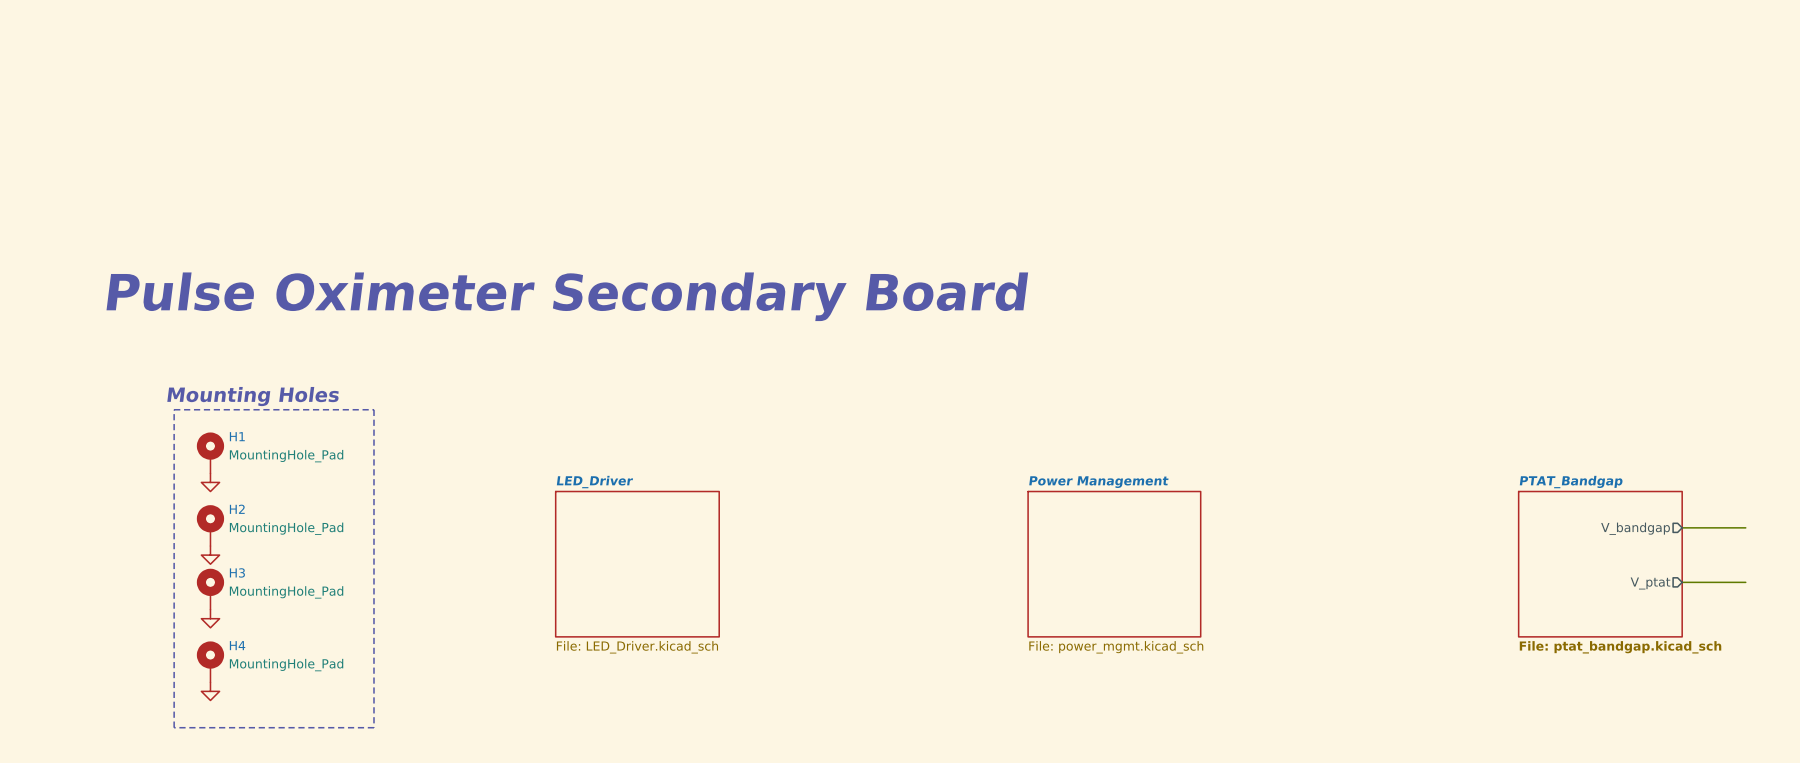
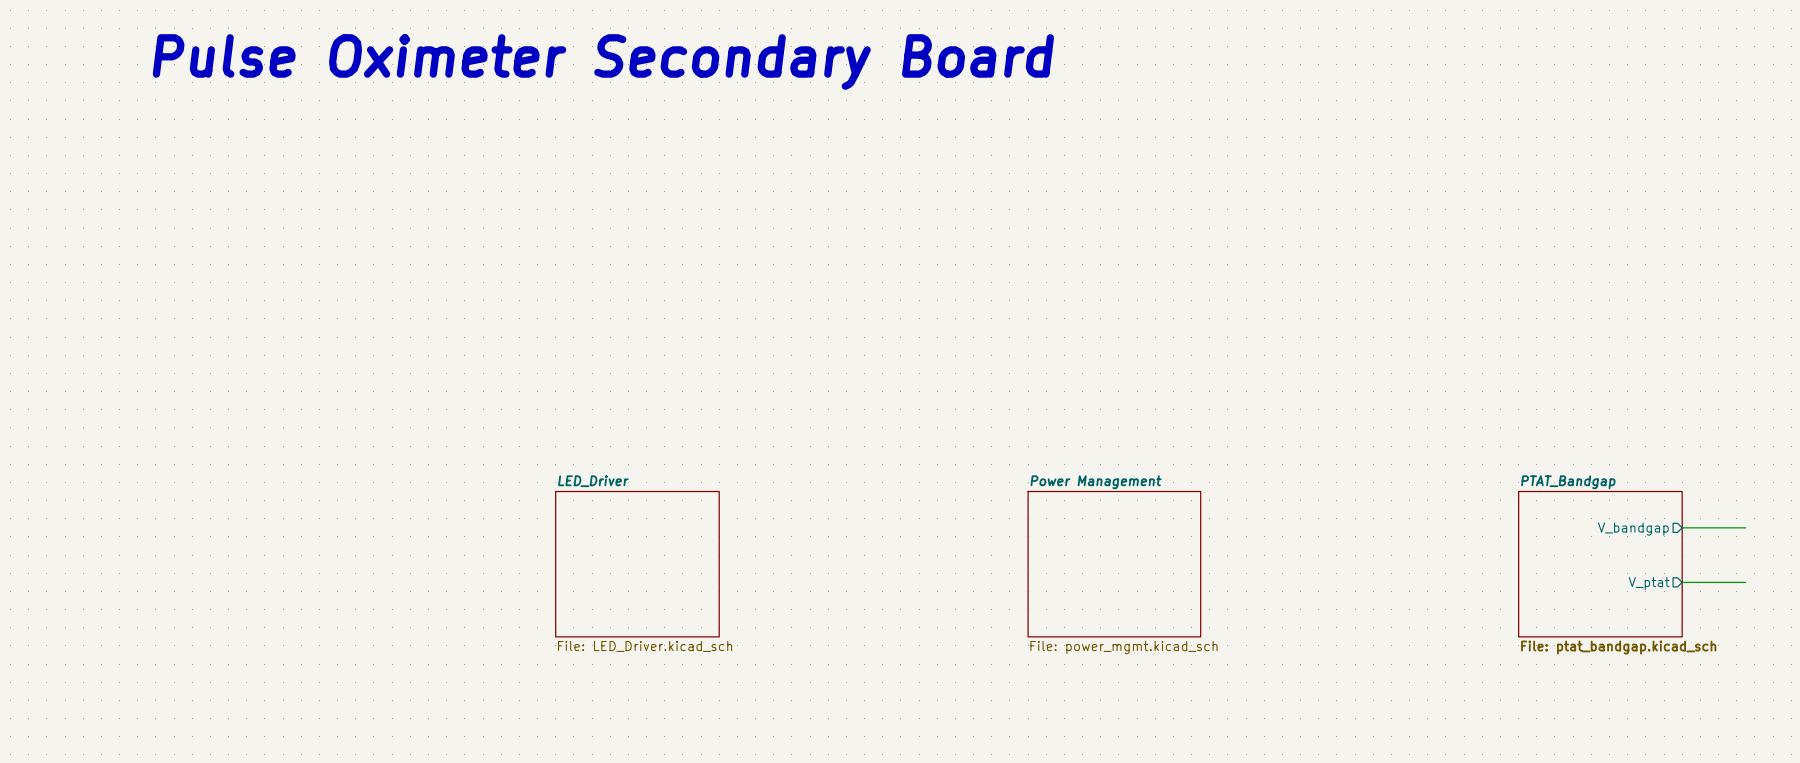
text: none -> Pulse Oximeter Secondary Board (603, 62)
text: Pulse Oximeter Secondary Board (567, 296) -> none
text: Mounting Holes (253, 396) -> none
line: (174, 409) (373, 409) (373, 727) (174, 727) (174, 409) -> none
H1: MountingHole_Pad (210, 452) -> none
power symbol: (210, 482) -> none
H2: MountingHole_Pad (210, 525) -> none
power symbol: (210, 555) -> none
H3: MountingHole_Pad (210, 589) -> none
power symbol: (210, 618) -> none
H4: MountingHole_Pad (210, 661) -> none
power symbol: (210, 691) -> none

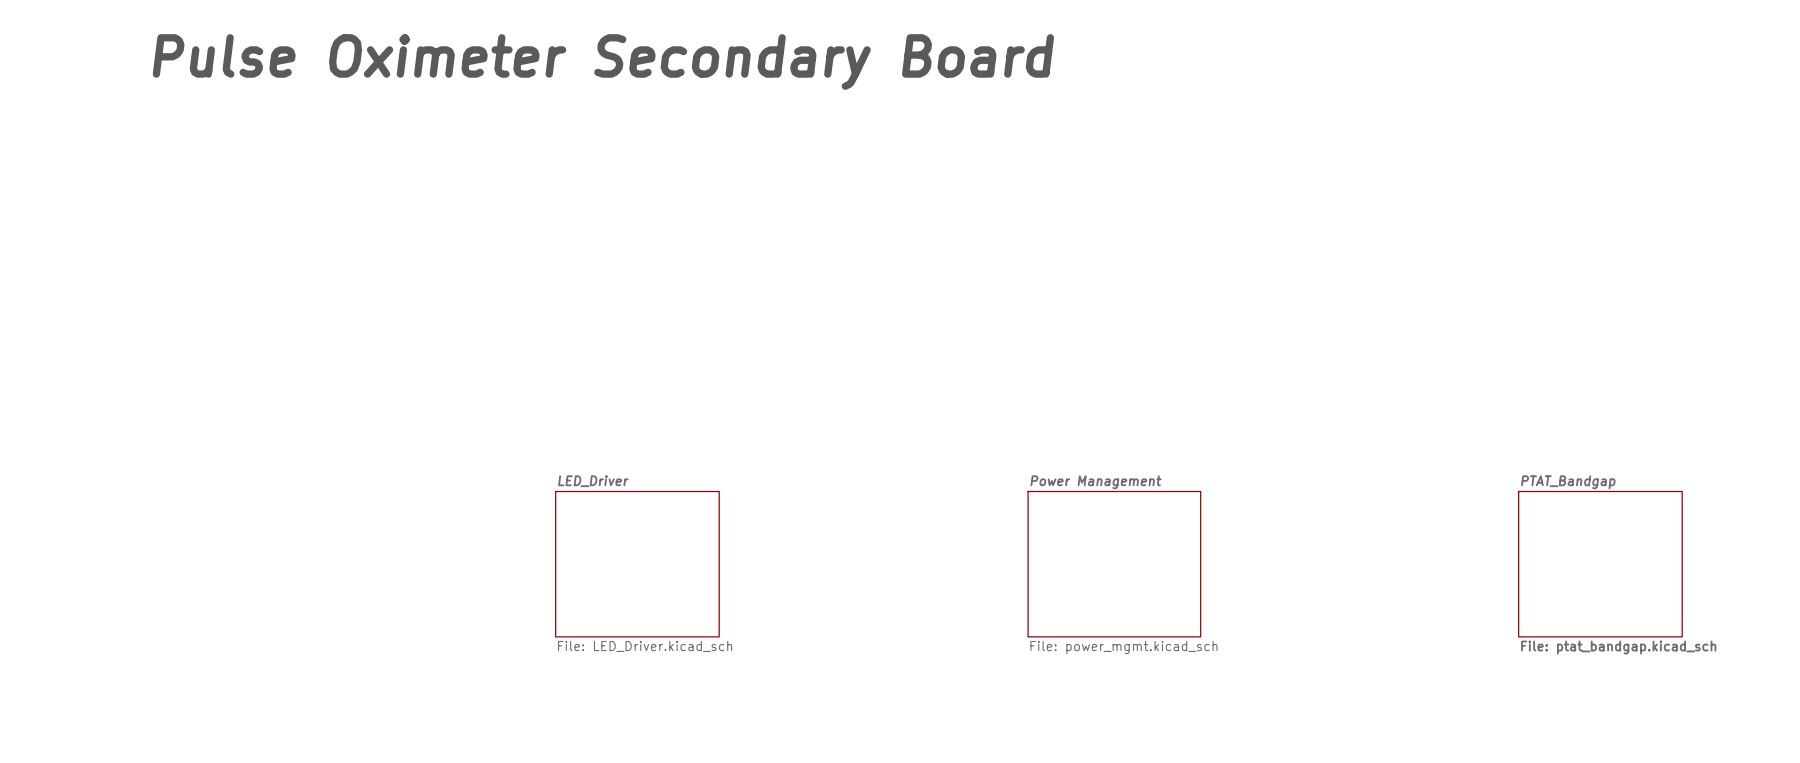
wire: (1682, 527) (1745, 527) -> none
sheet pin: V_bandgap (1633, 529) -> none
wire: (1682, 582) (1745, 582) -> none
sheet pin: V_ptat (1649, 583) -> none

